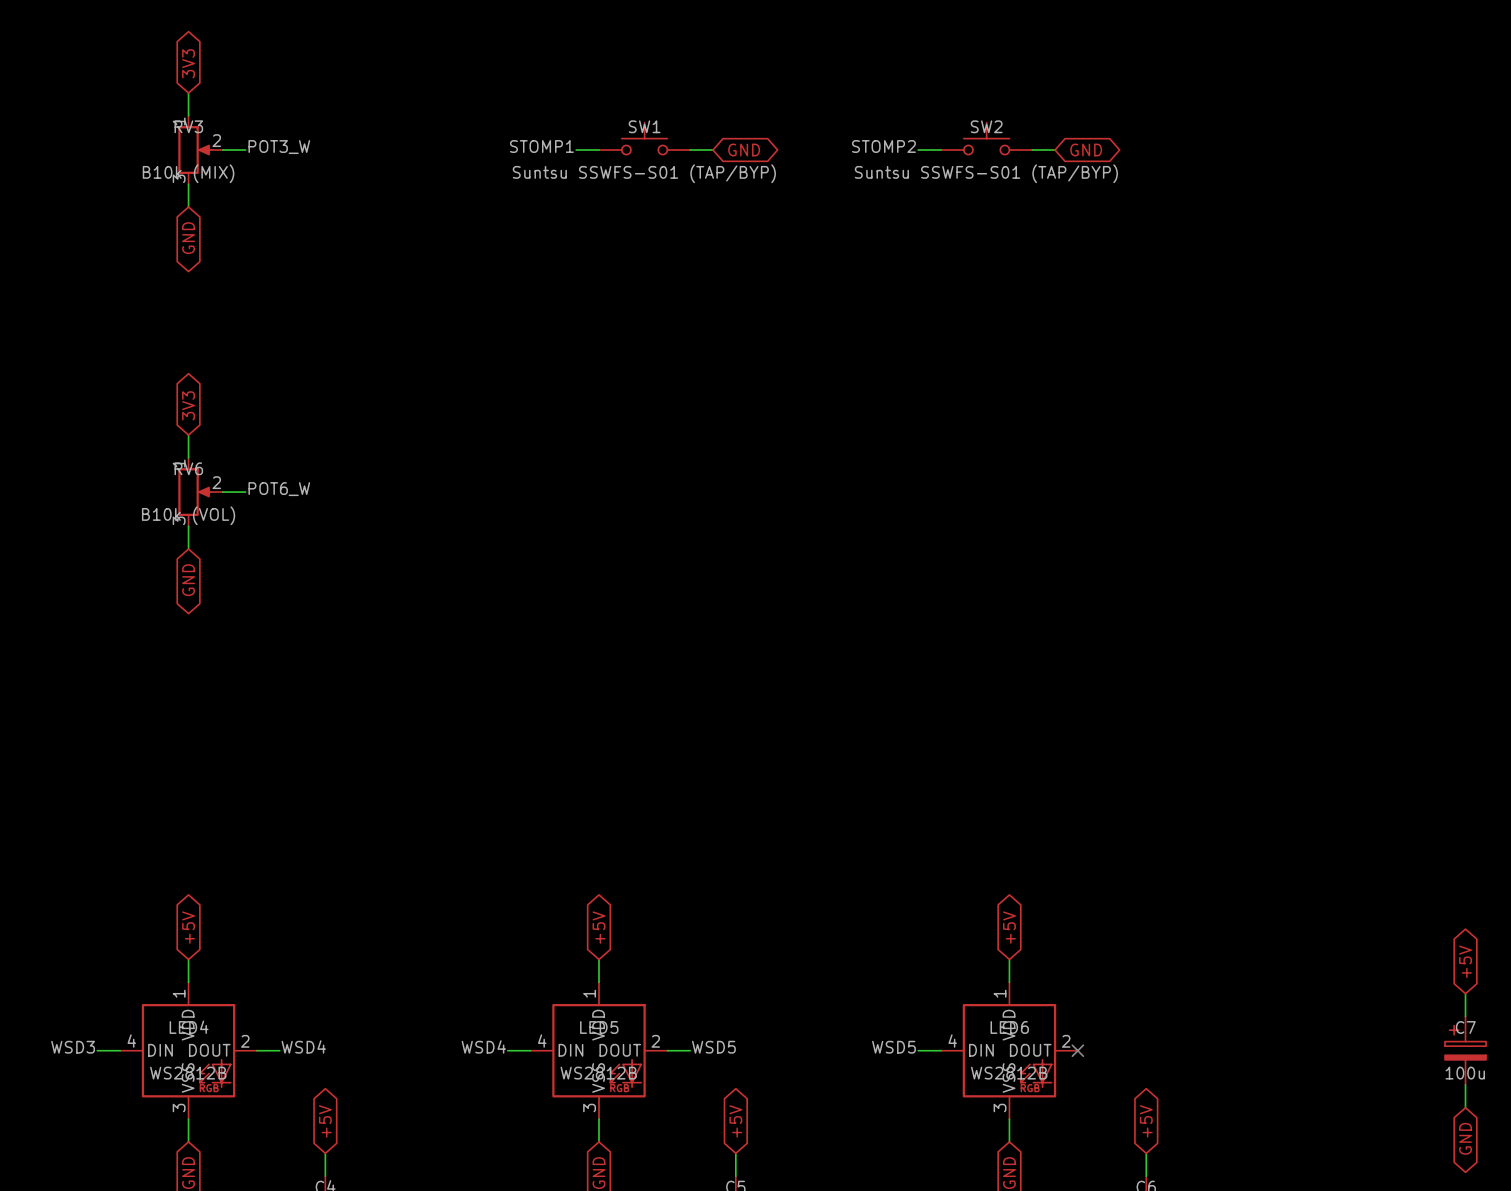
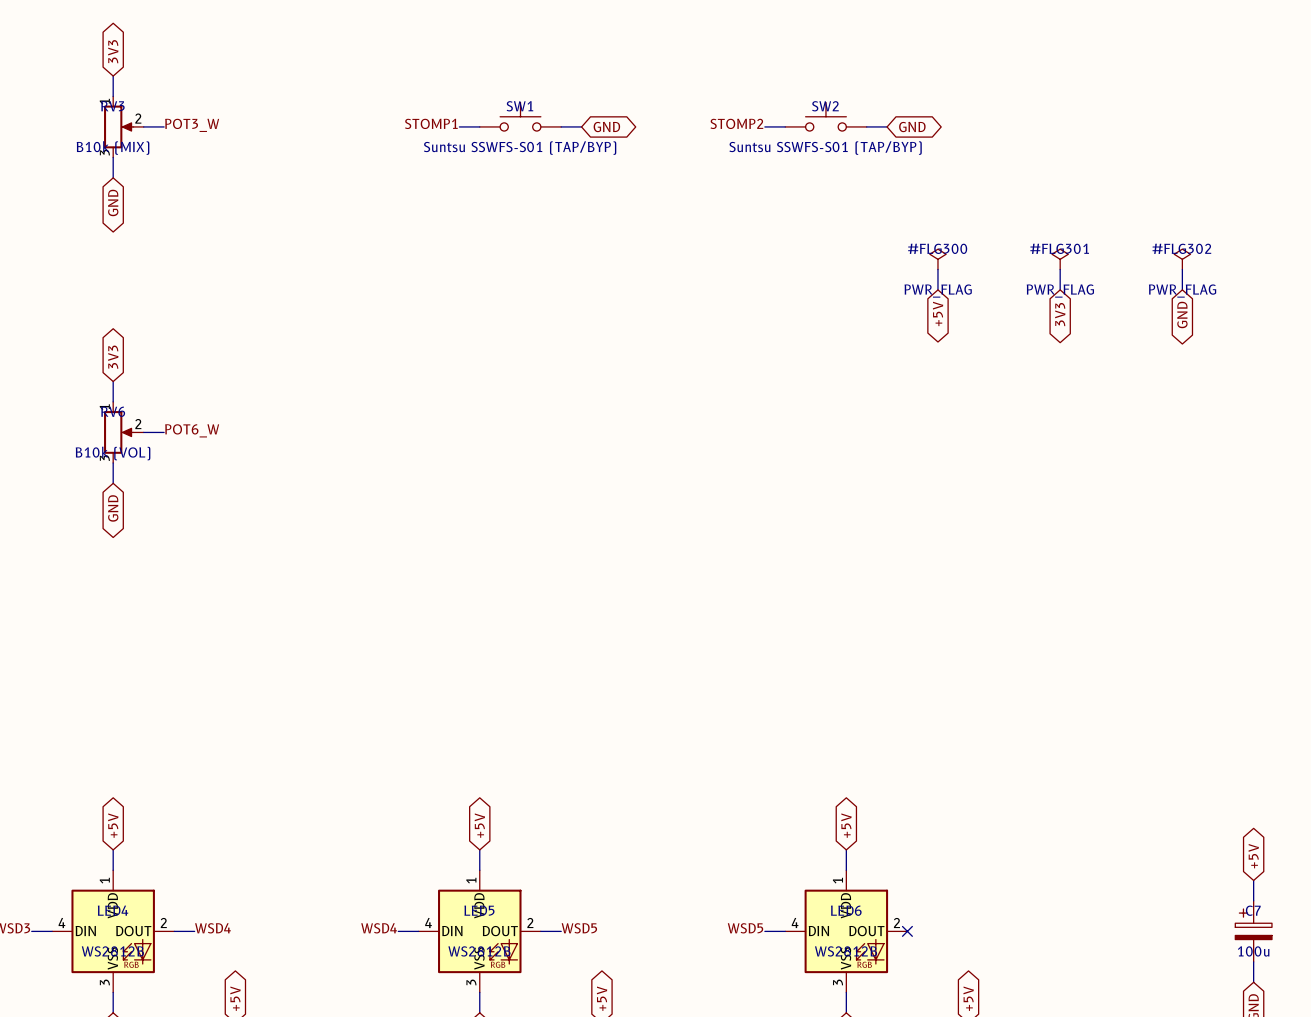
#FLG300: none -> PWR_FLAG (937, 259)
#FLG301: none -> PWR_FLAG (1060, 259)
#FLG302: none -> PWR_FLAG (1182, 259)
wire: none -> (937, 269) (937, 289)
wire: none -> (1060, 269) (1060, 289)
wire: none -> (1182, 269) (1182, 289)
global label: none -> +5V (938, 313)
global label: none -> 3V3 (1060, 314)
global label: none -> GND (1182, 314)

